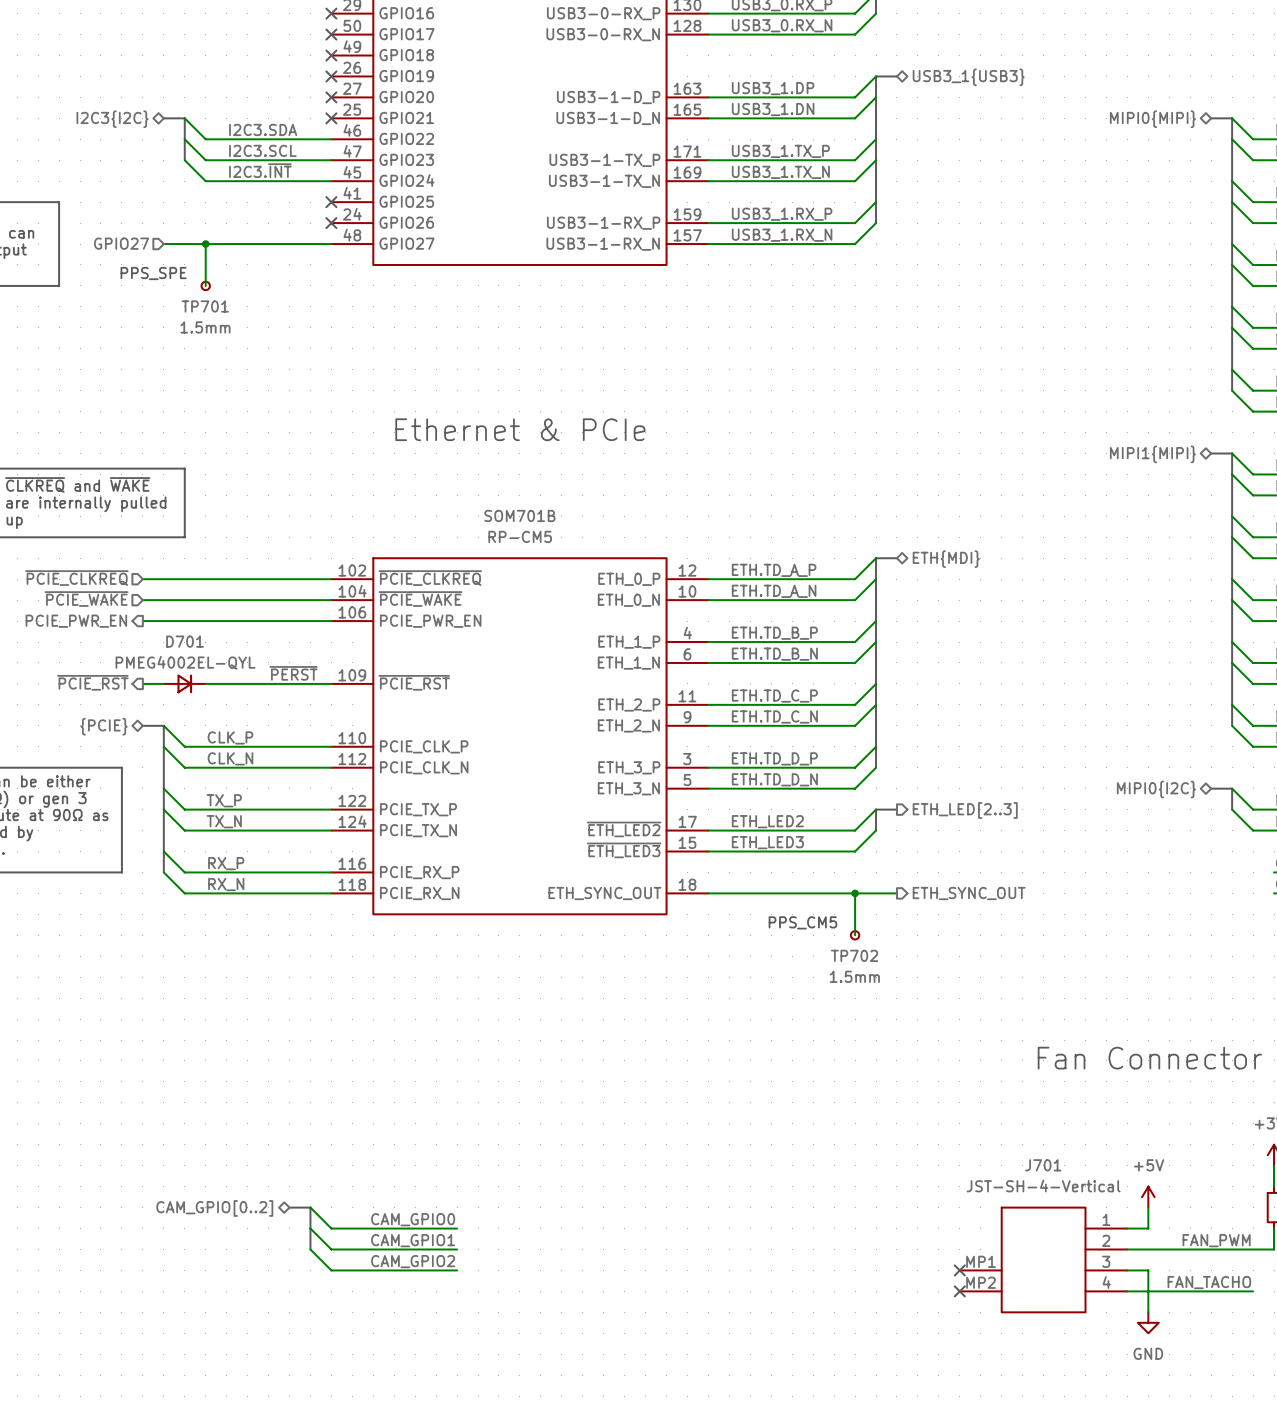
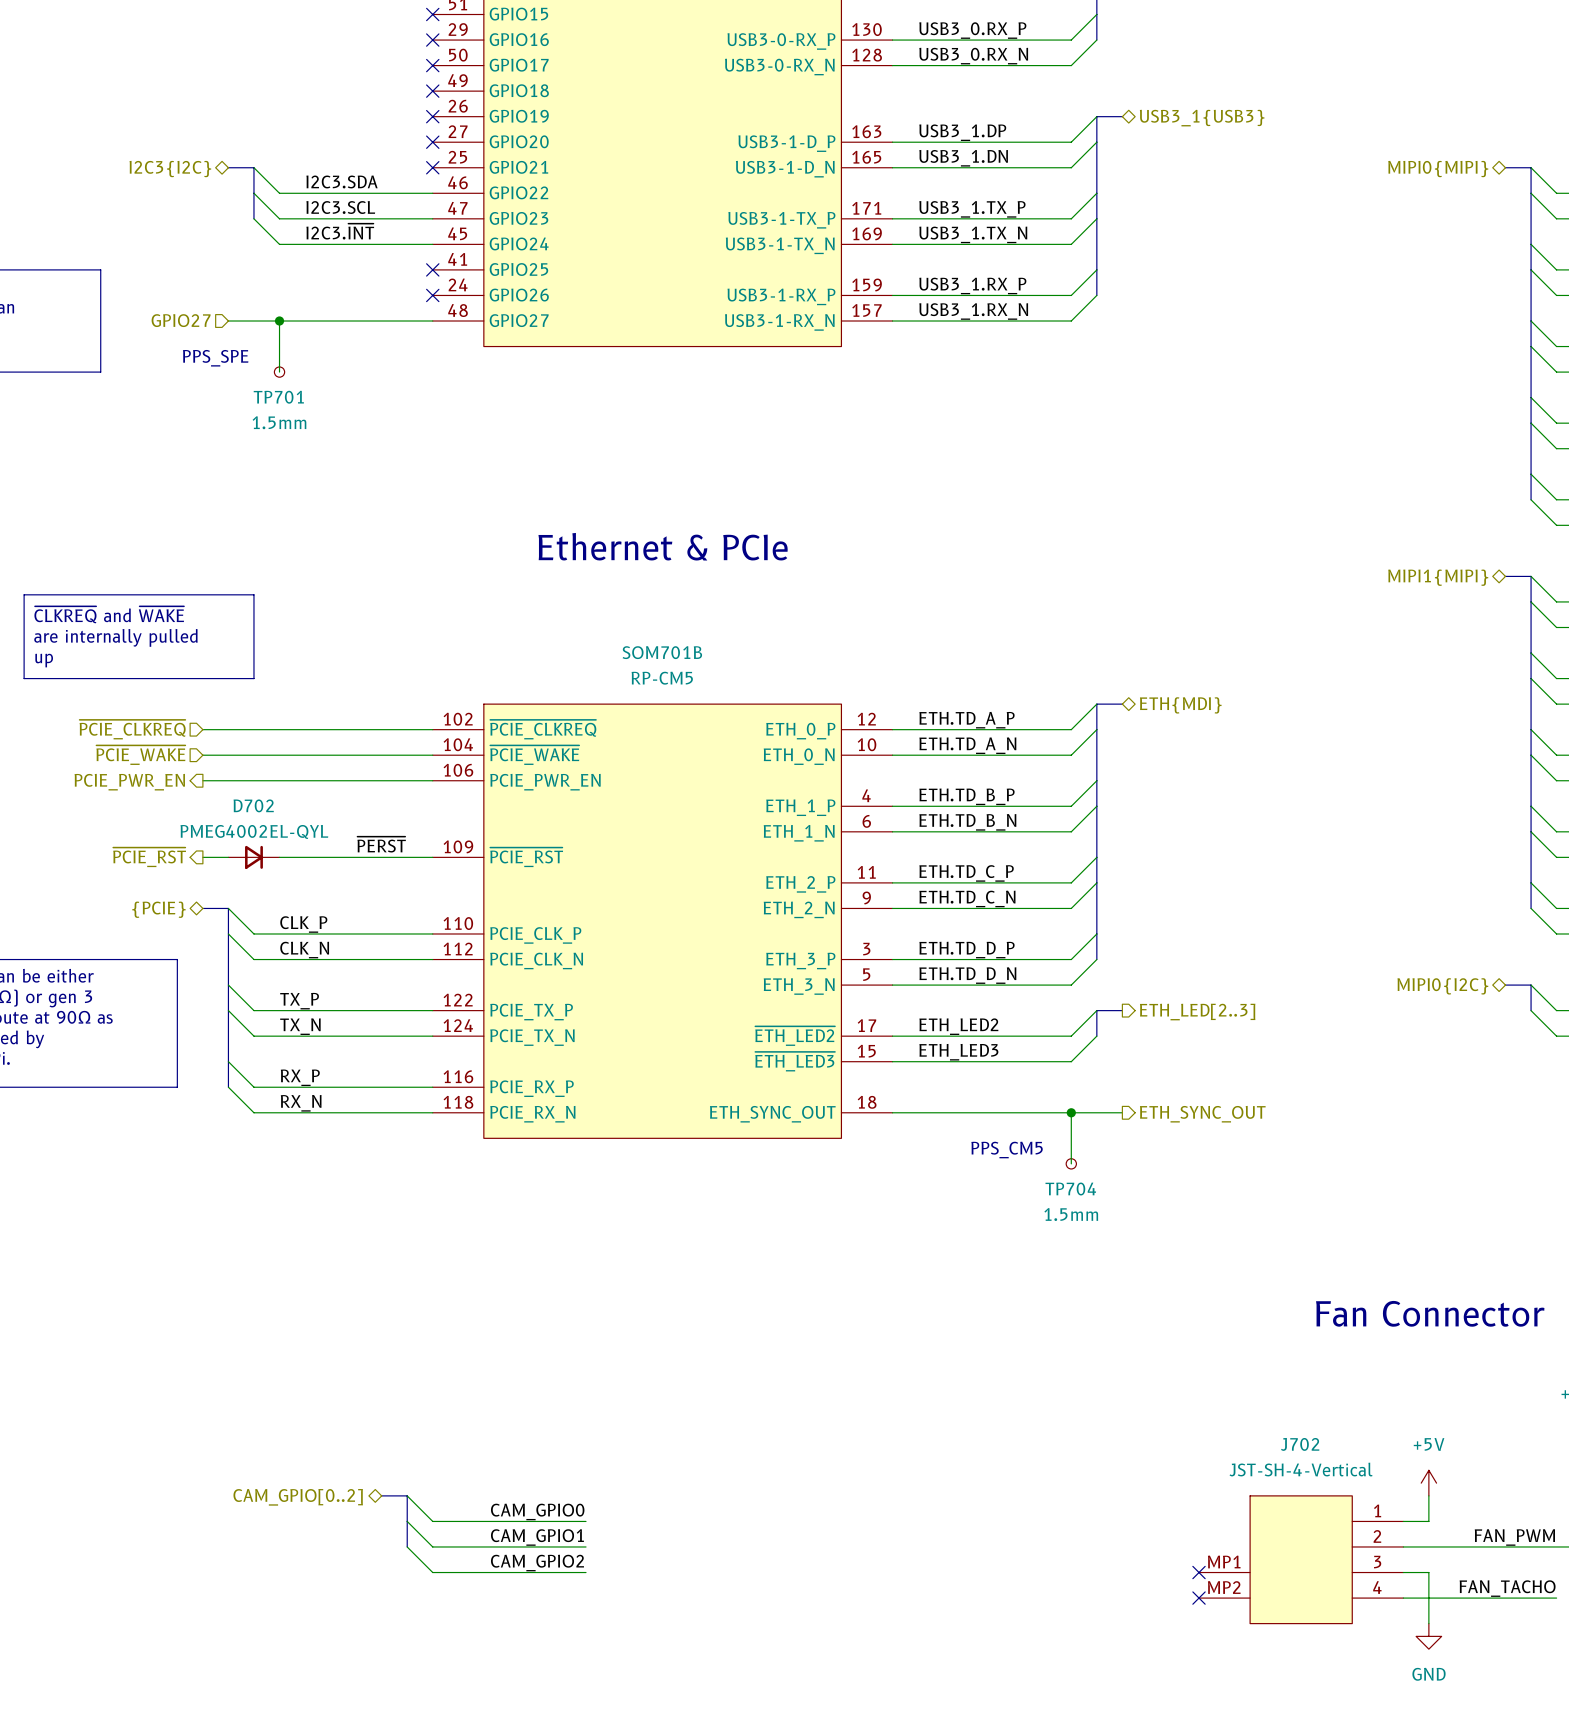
D701 name: D701 (185, 641) -> D702 (253, 805)
TP702 name: TP702 (854, 955) -> TP704 (1070, 1189)
J701 name: J701 (1043, 1165) -> J702 (1300, 1444)

